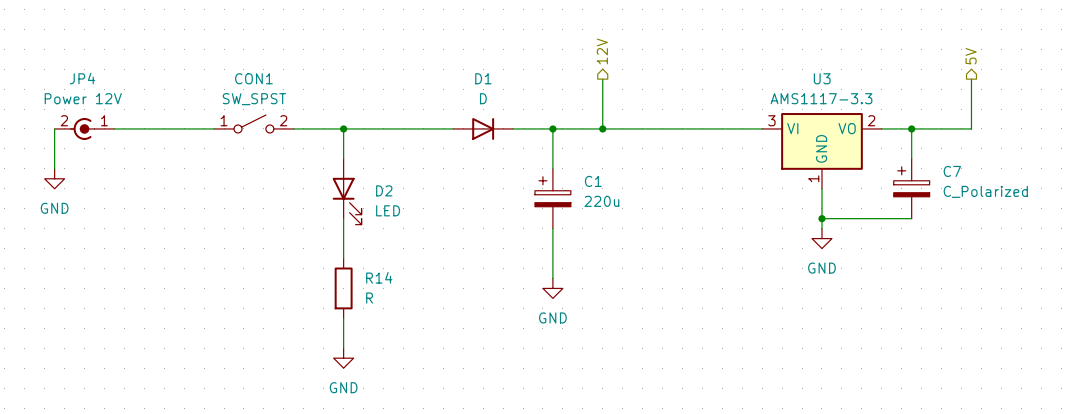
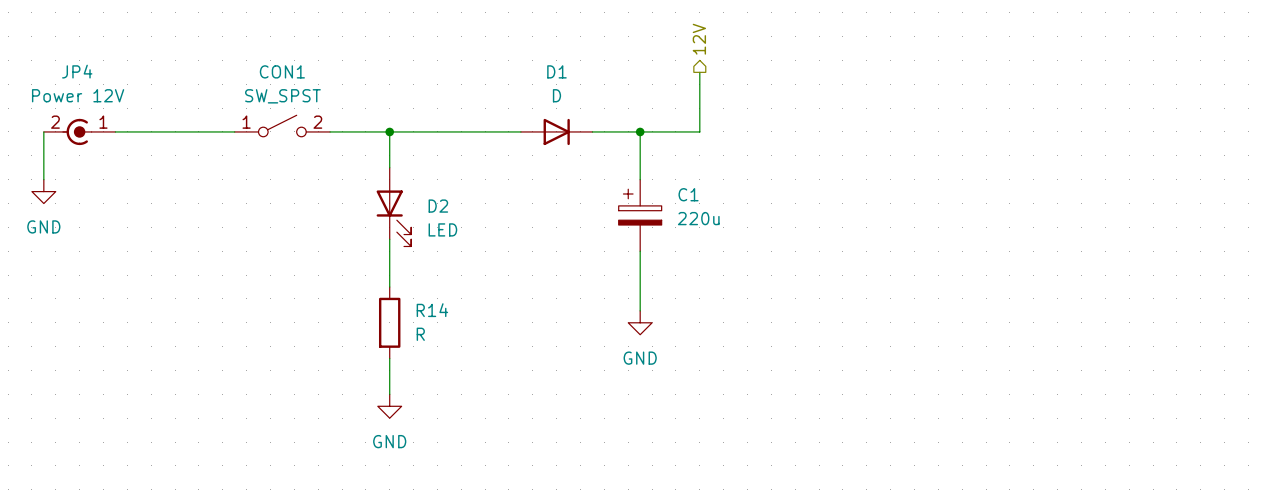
hierarchical label: 5V (971, 56) -> none
wire: (971, 79) (971, 128) (881, 128) -> none
wire: (602, 128) (762, 128) -> none
junction: (602, 128) -> none
wire: (911, 128) (911, 158) -> none
junction: (911, 128) -> none
U3: AMS1117-3.3 (821, 150) -> none
wire: (821, 188) (821, 228) -> none
C7: C_Polarized (911, 188) -> none
wire: (821, 218) (911, 218) -> none
junction: (821, 218) -> none
power symbol: GND (821, 238) -> none

